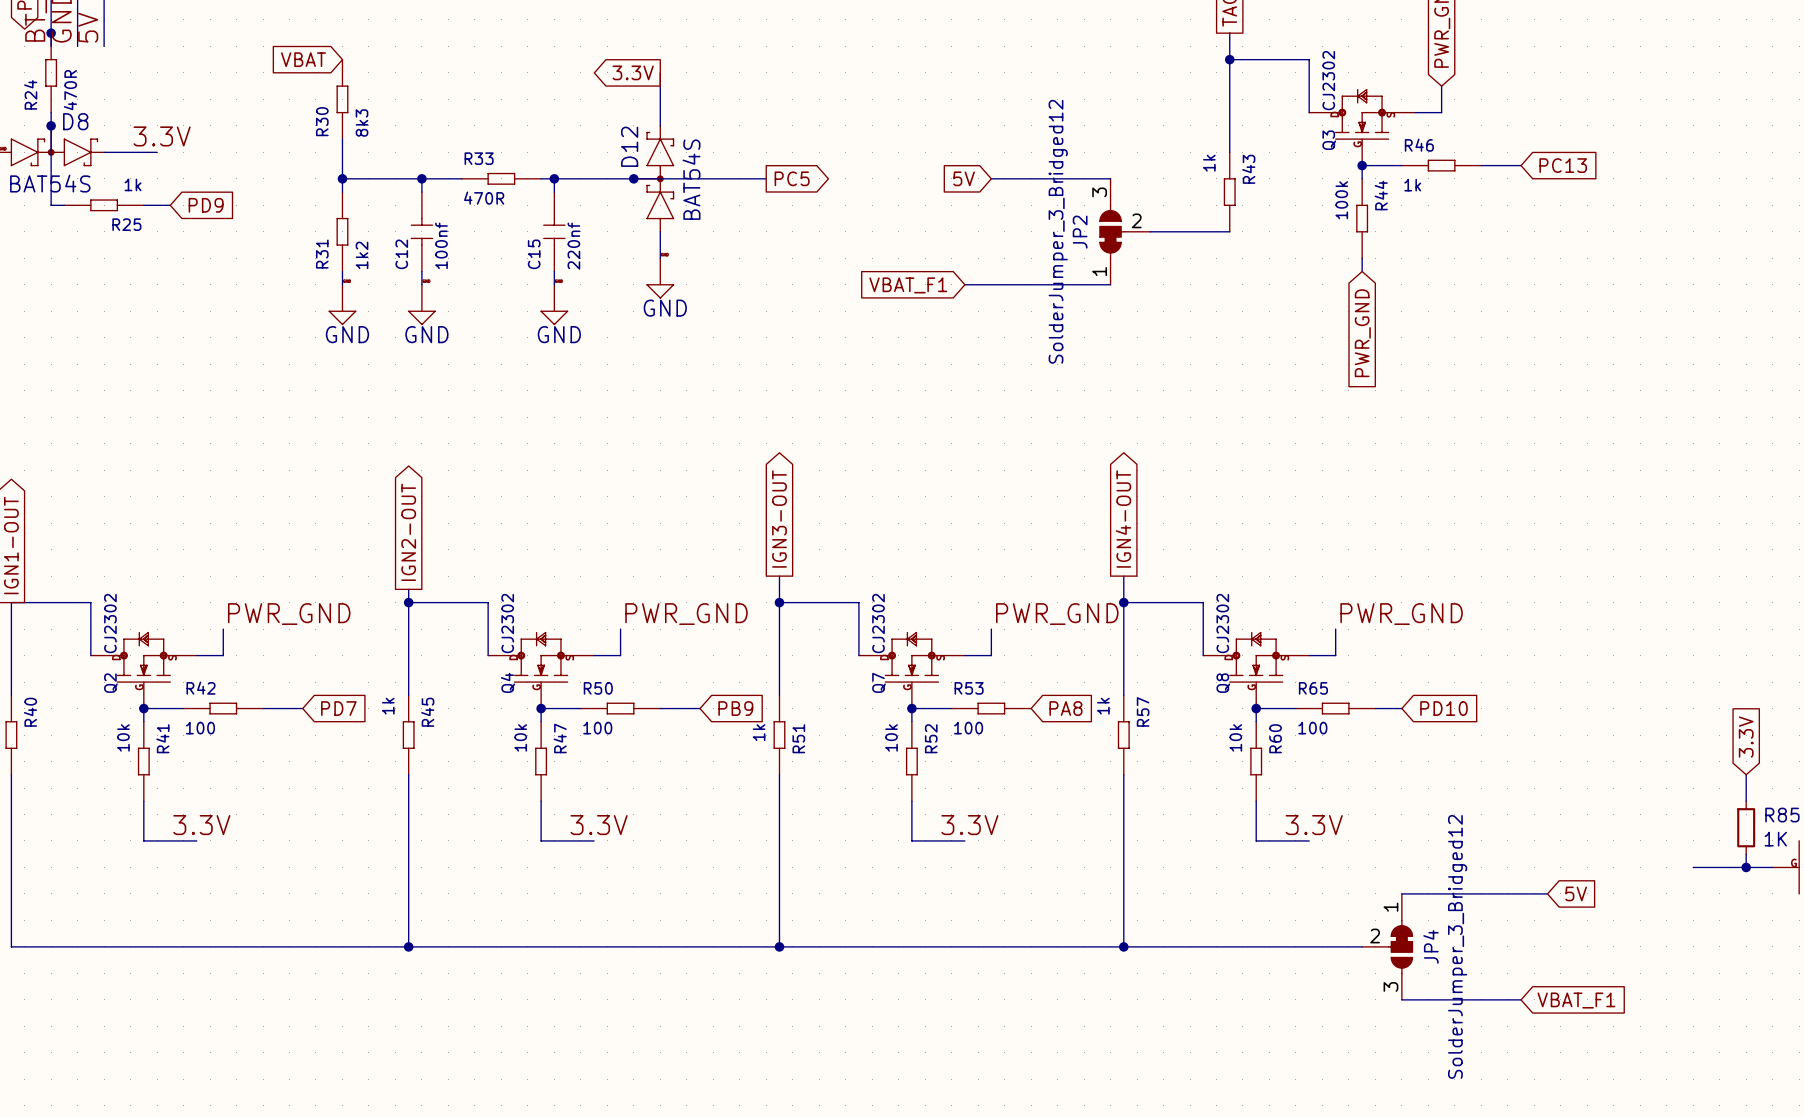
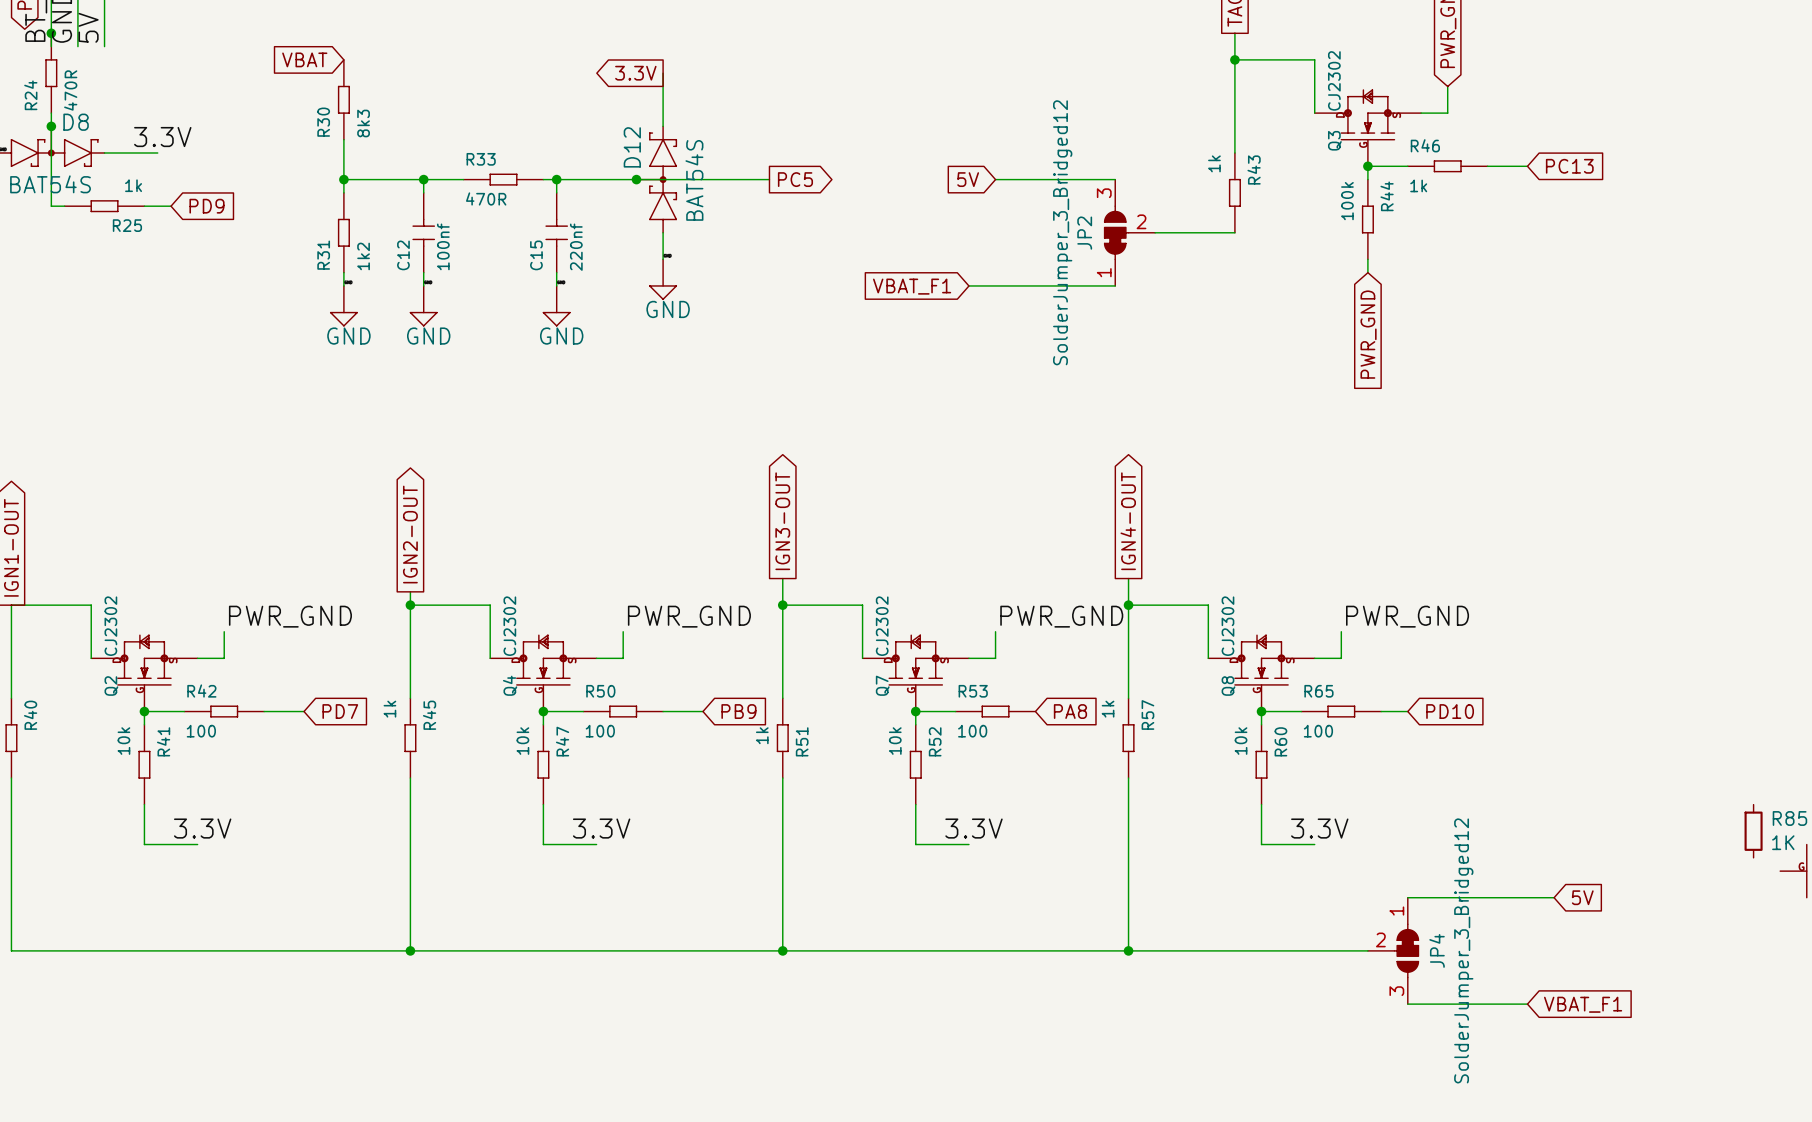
global label: 3.3V (1746, 737) -> none
wire: (1746, 774) (1746, 801) -> none
wire: (1746, 854) (1746, 867) -> none
wire: (1693, 867) (1772, 867) -> none
junction: (1746, 867) -> none

